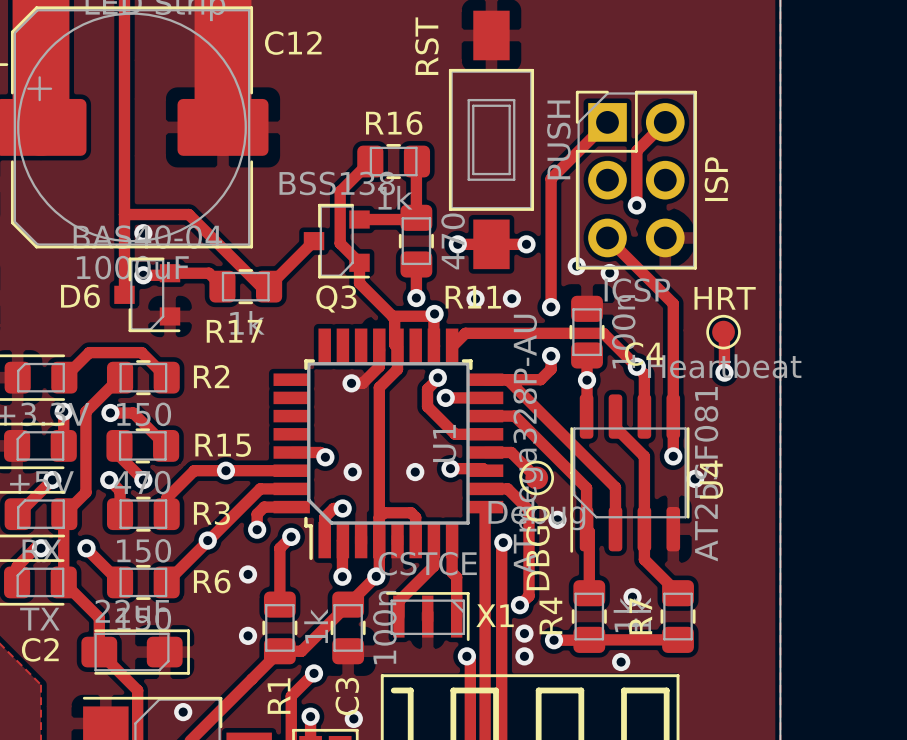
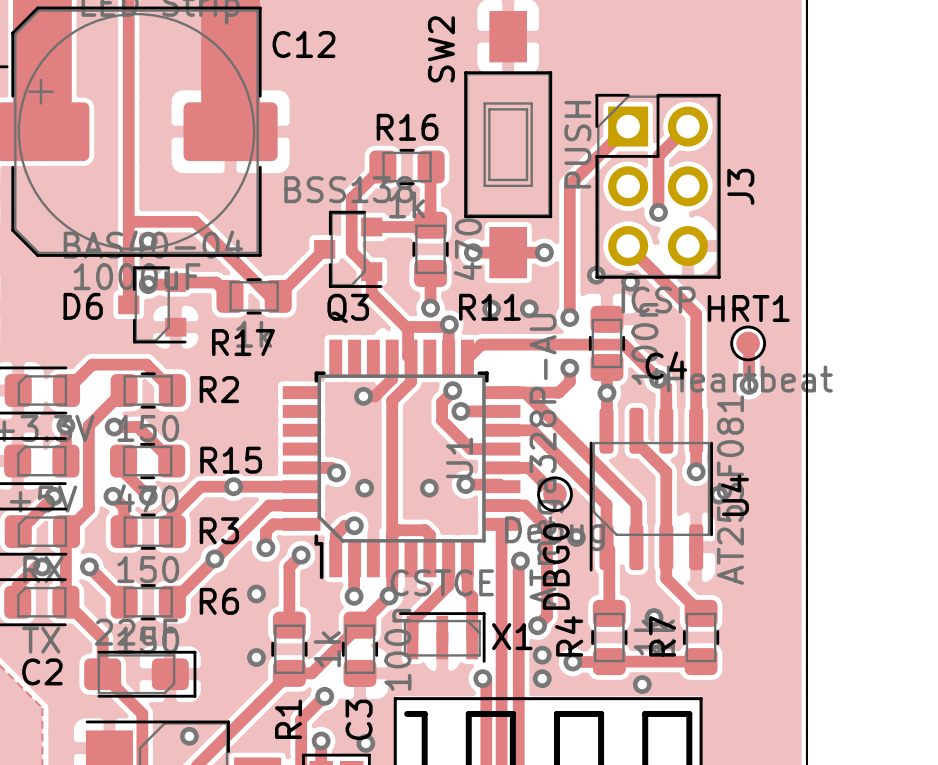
RST name: RST (426, 46) -> SW2 (441, 49)
ISP name: ISP (716, 179) -> J3 (740, 186)
HRT name: HRT (725, 298) -> HRT1 (748, 308)

